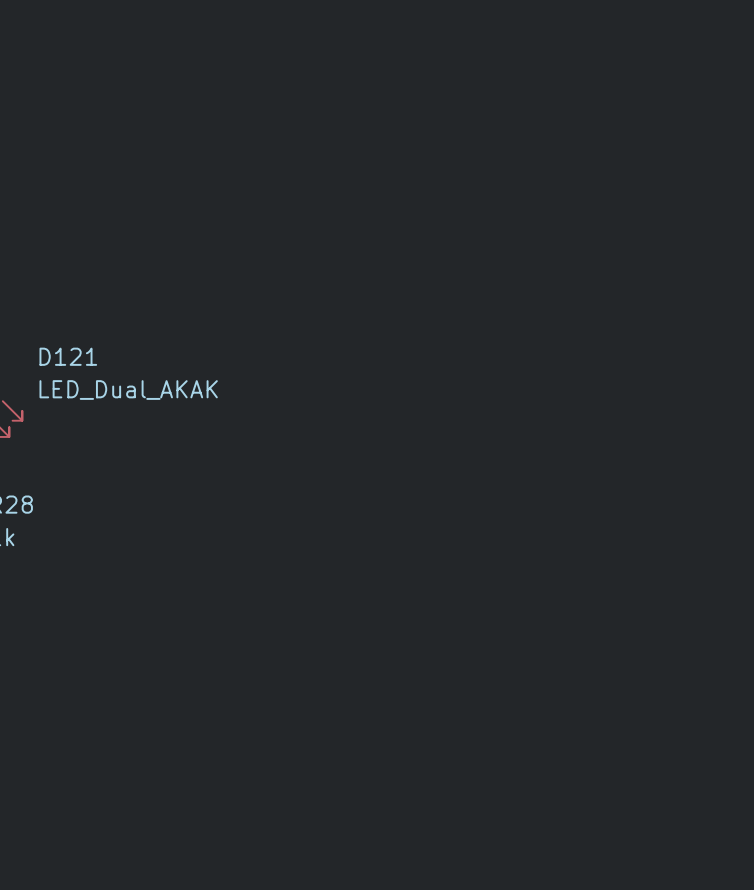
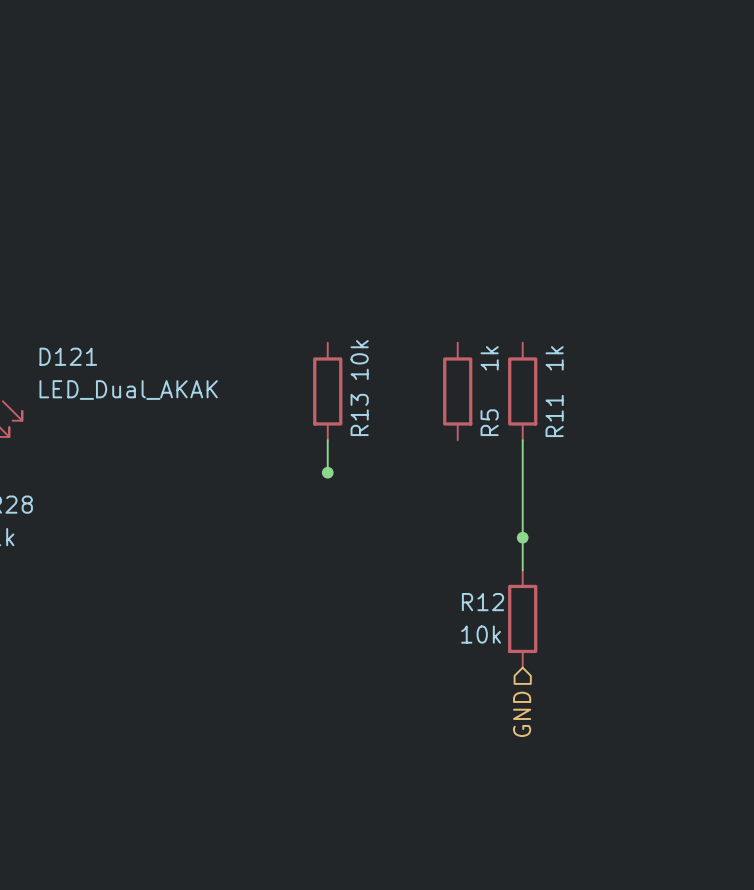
R13: none -> 10k (327, 391)
R5: none -> 1k (457, 391)
R11: none -> 1k (522, 391)
wire: none -> (327, 440) (327, 472)
wire: none -> (522, 440) (522, 570)
junction: none -> (327, 472)
junction: none -> (522, 537)
R12: none -> 10k (522, 618)
hierarchical label: none -> GND (522, 714)

